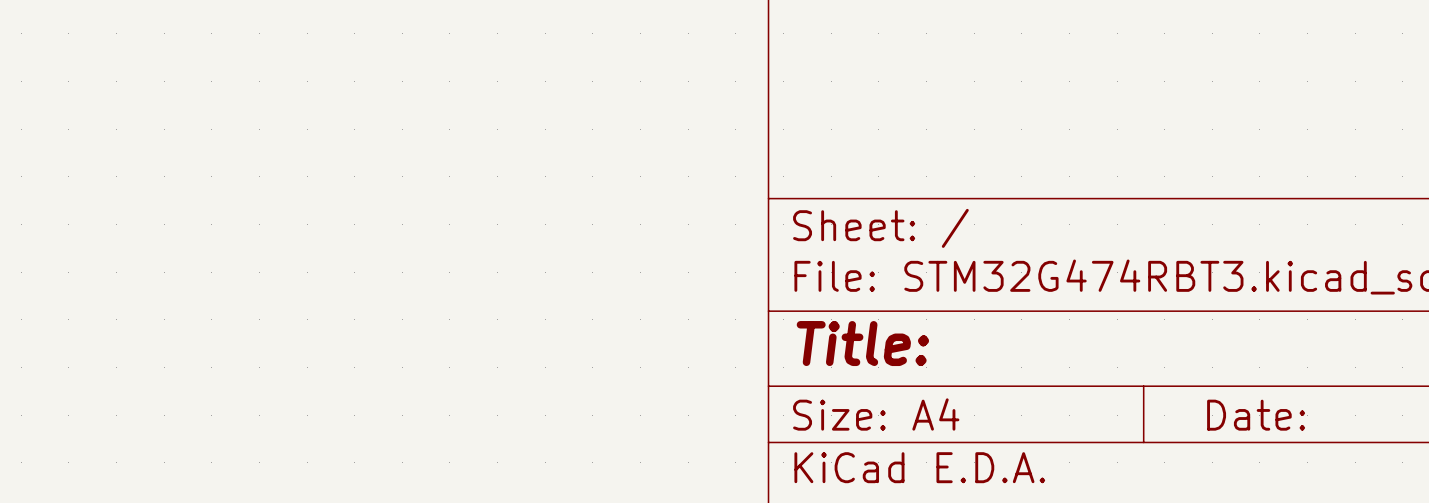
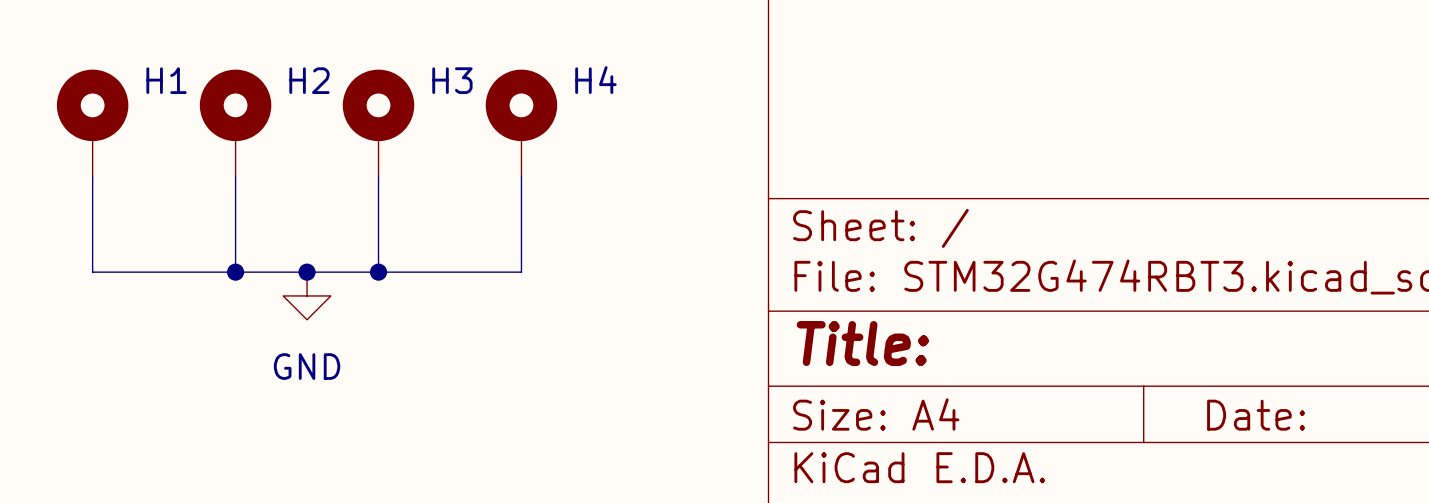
H1: none -> (92, 123)
H2: none -> (235, 123)
H3: none -> (378, 123)
H4: none -> (521, 123)
wire: none -> (92, 176) (92, 272) (521, 272) (521, 176)
wire: none -> (235, 176) (235, 272)
wire: none -> (378, 176) (378, 272)
junction: none -> (235, 272)
junction: none -> (307, 272)
junction: none -> (378, 272)
power symbol: none -> GND (307, 295)

